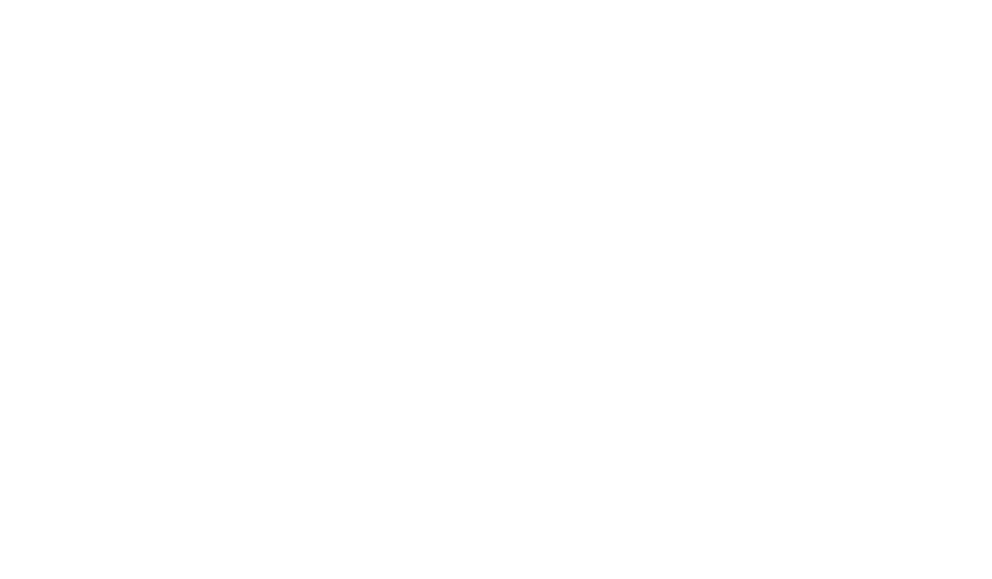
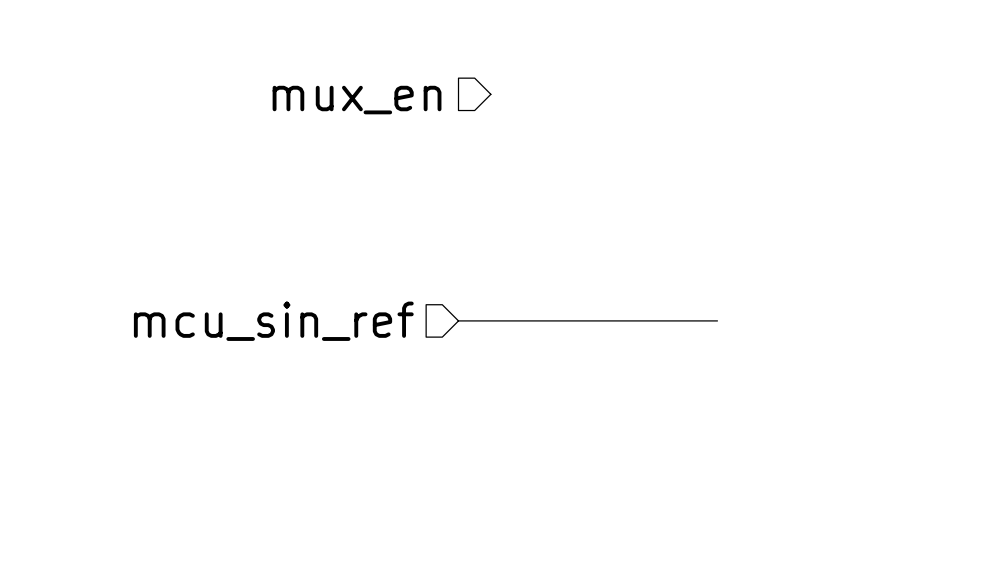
hierarchical label: none -> mux_en (357, 100)
wire: none -> (458, 320) (717, 320)
hierarchical label: none -> mcu_sin_ref (273, 321)

